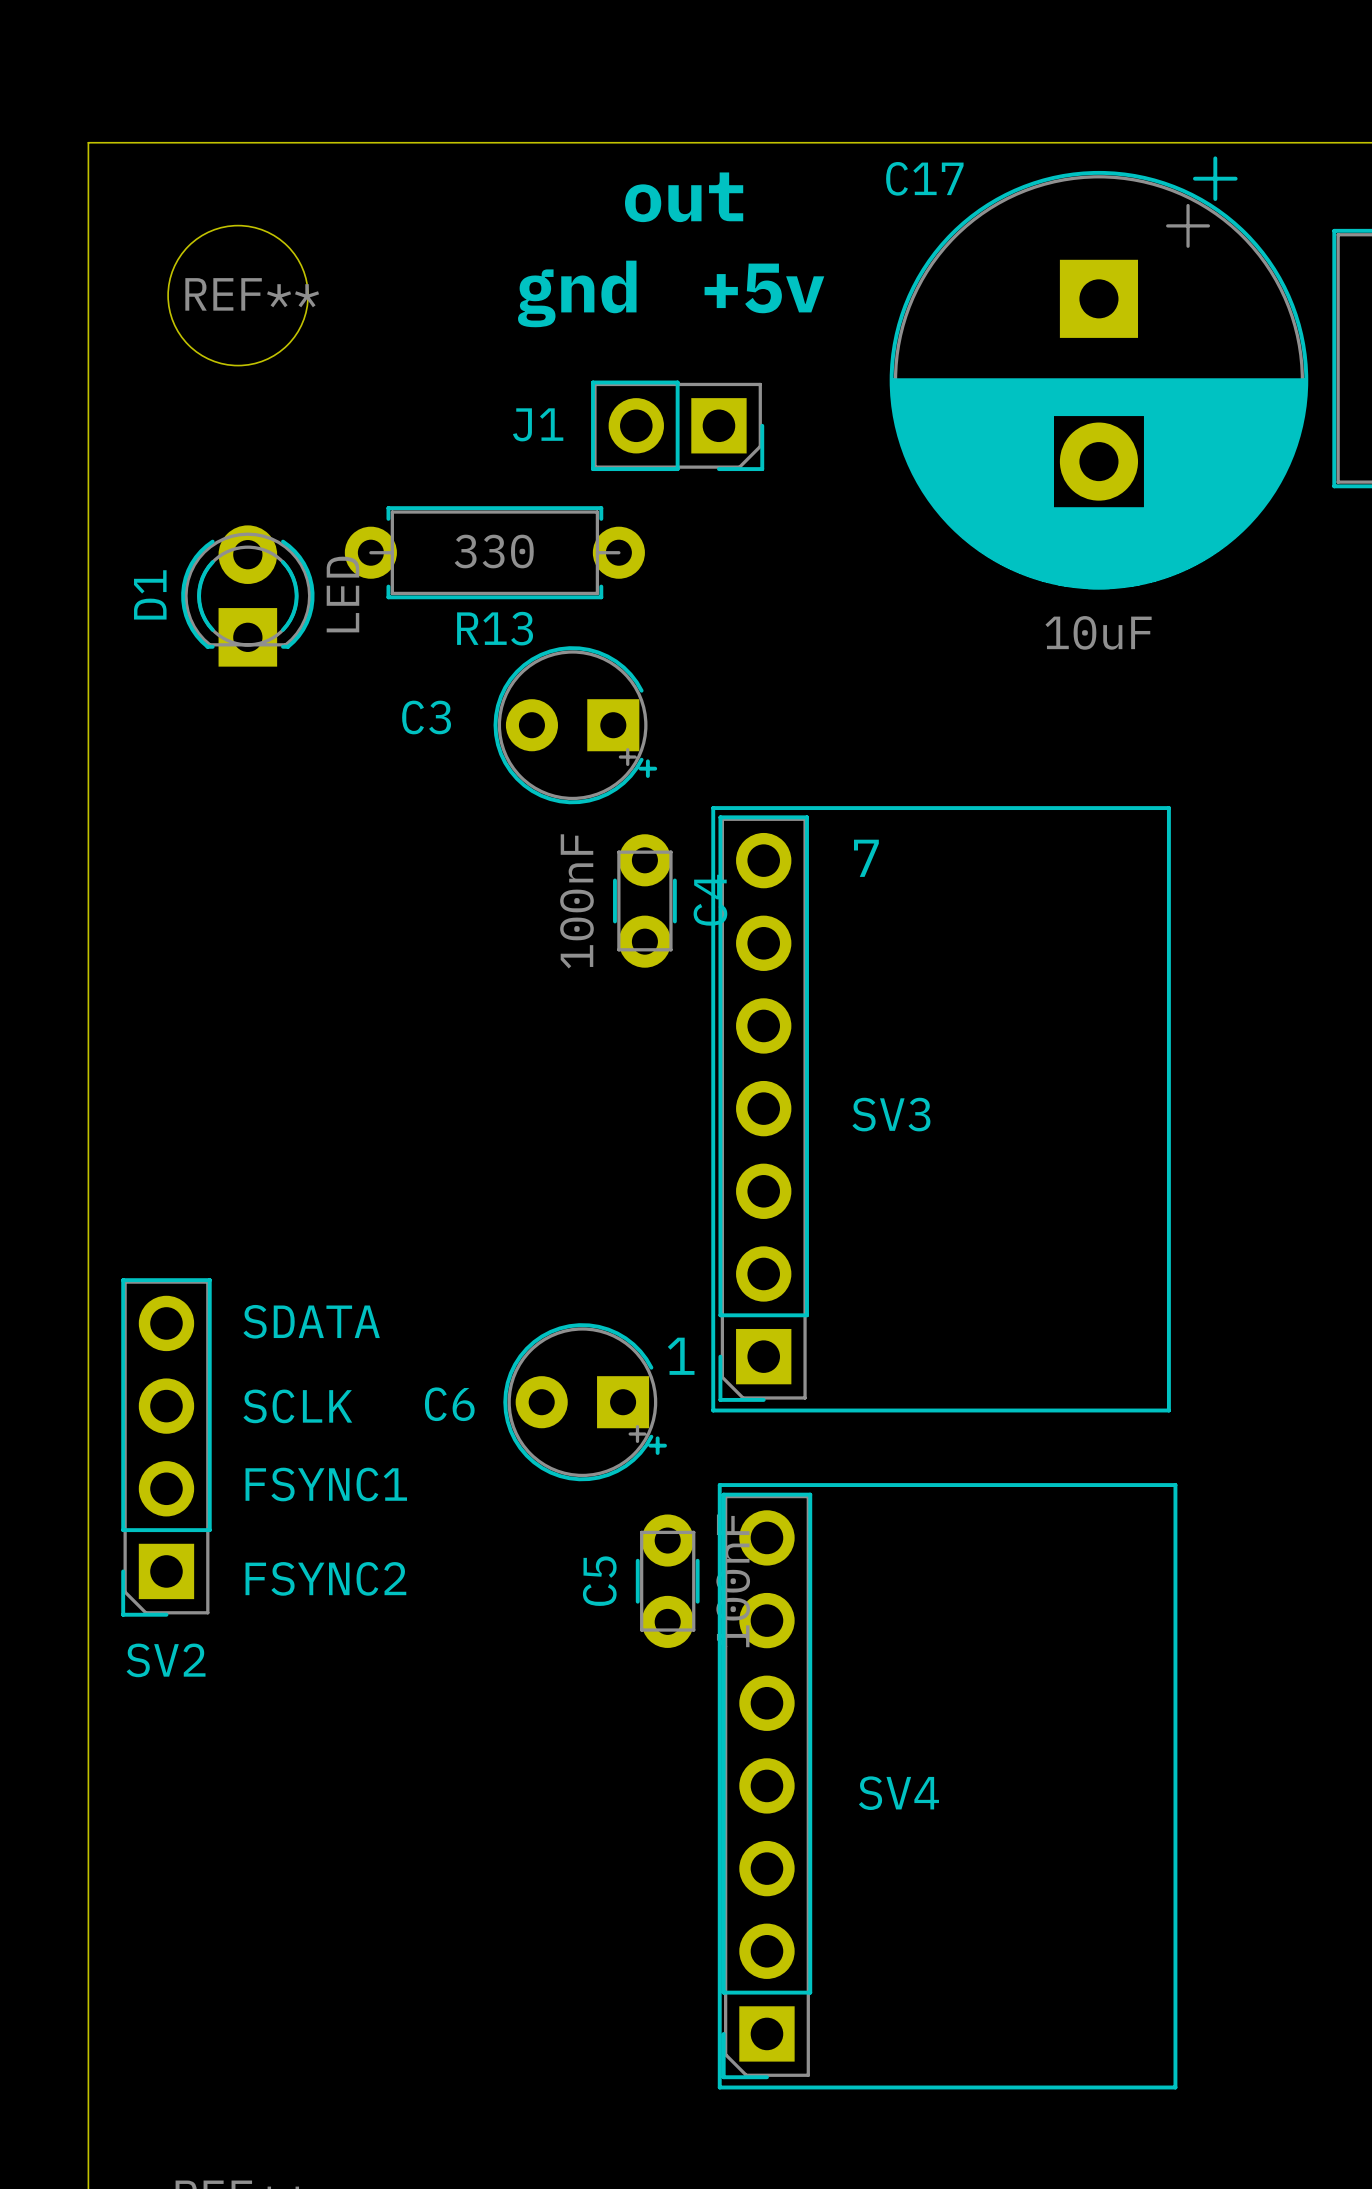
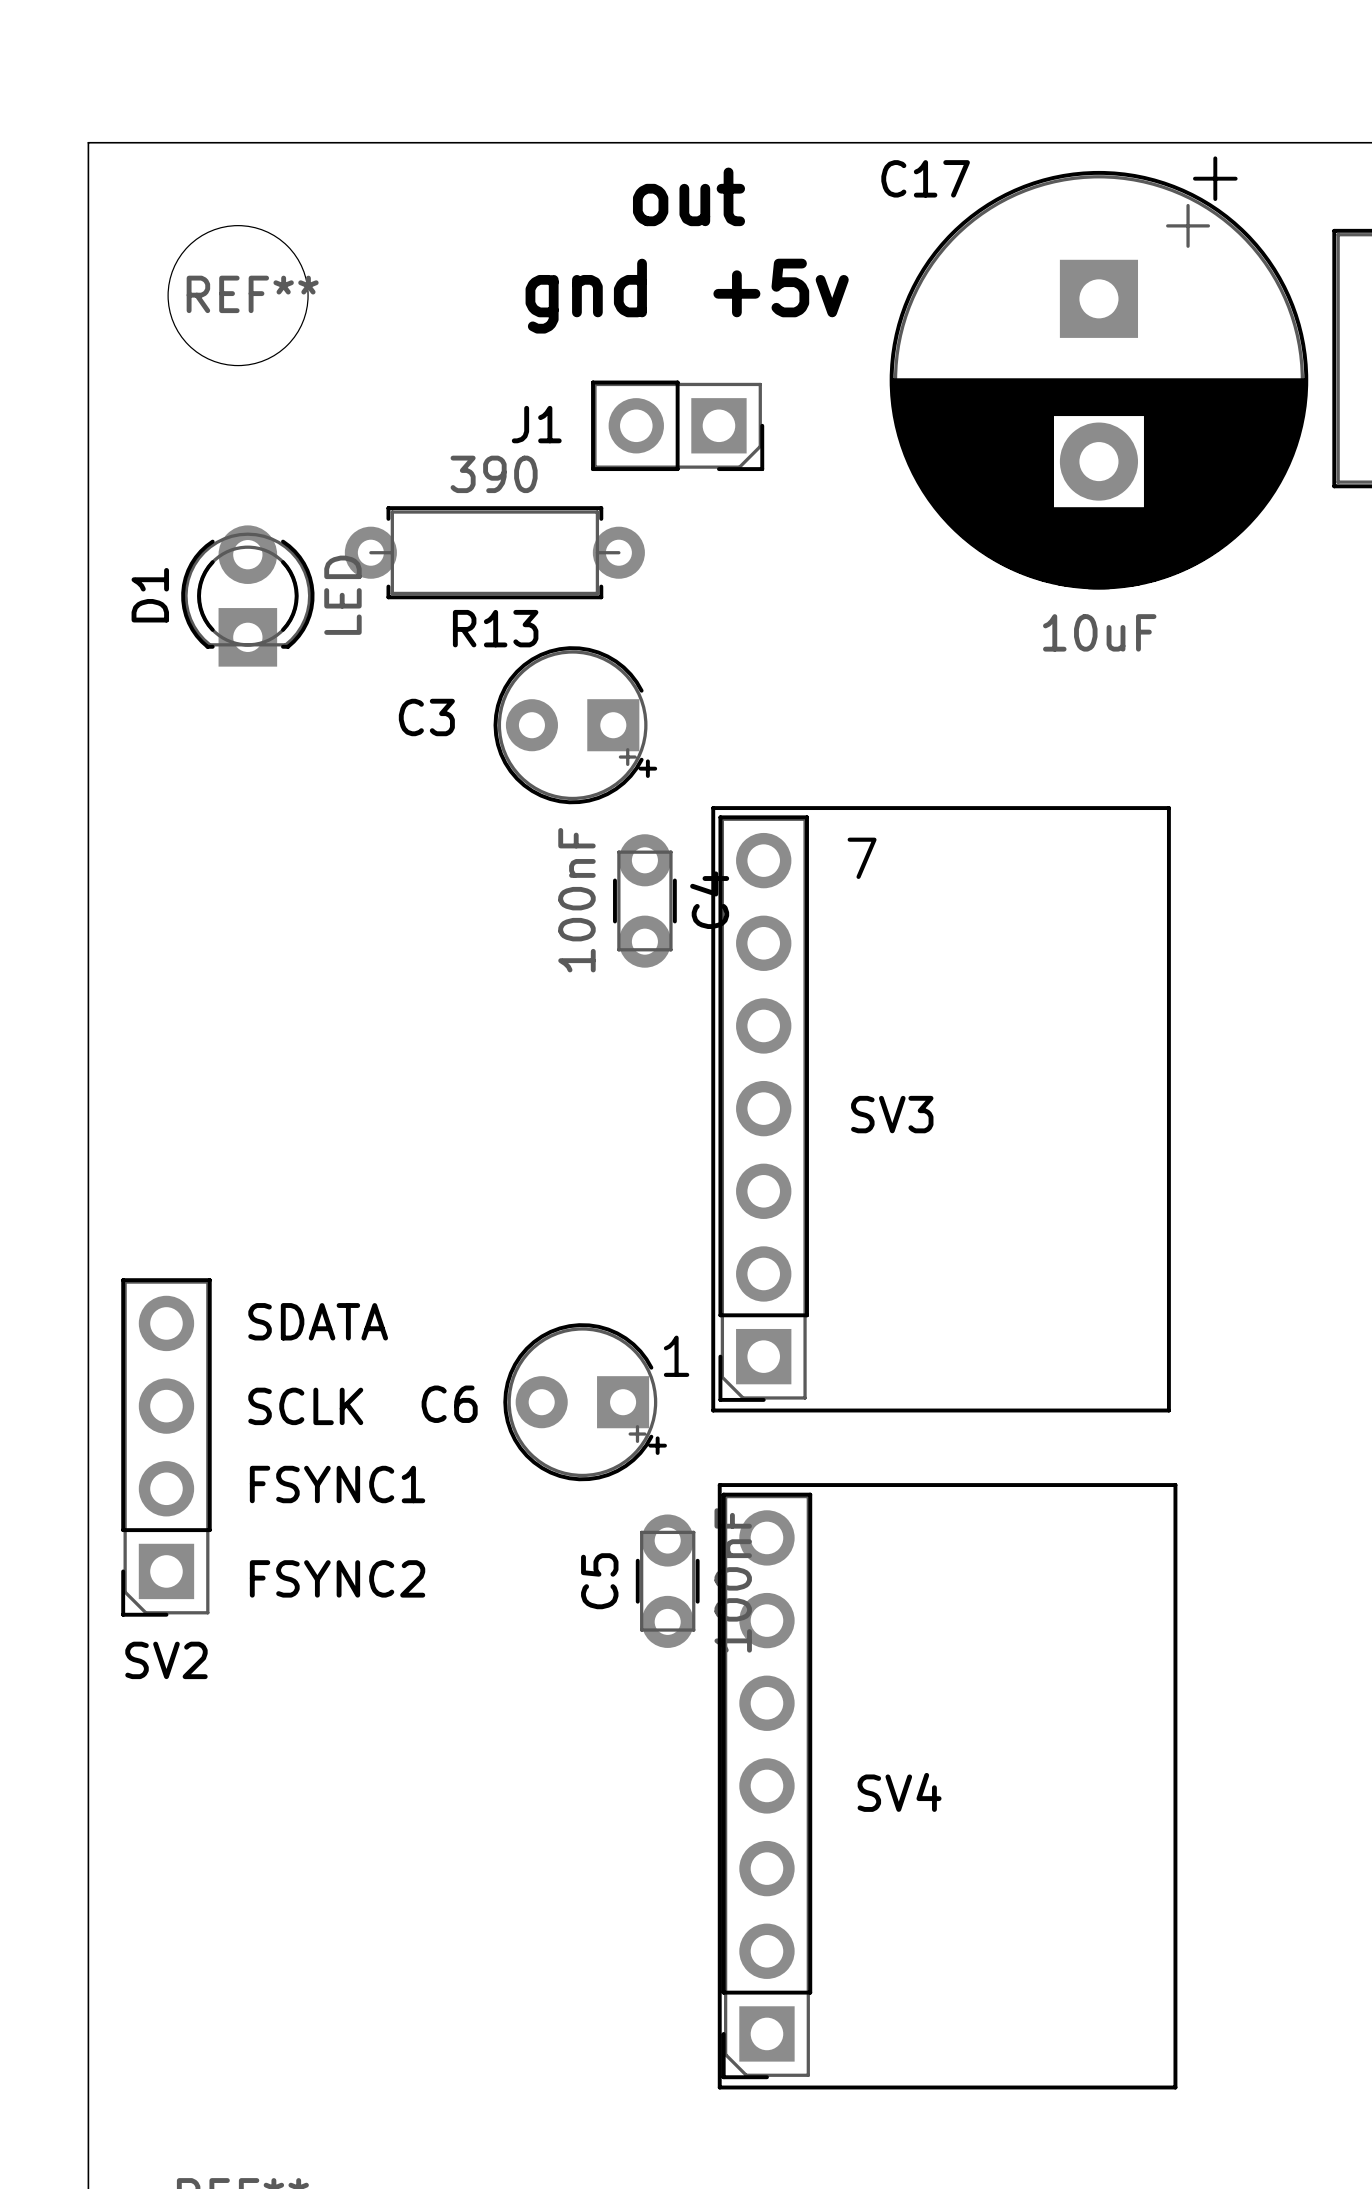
R13 value: 330 (494, 551) -> 390 (494, 474)

